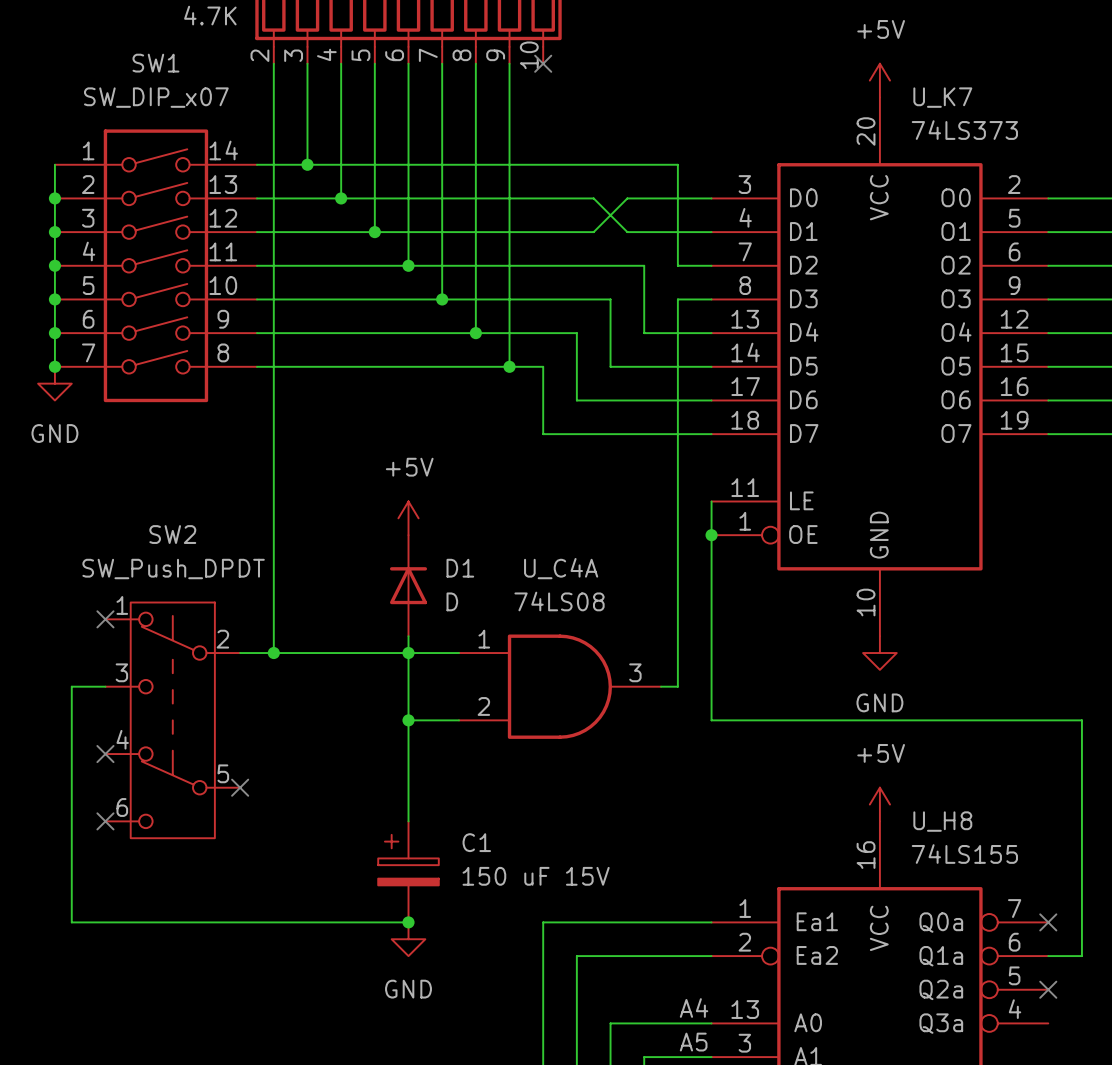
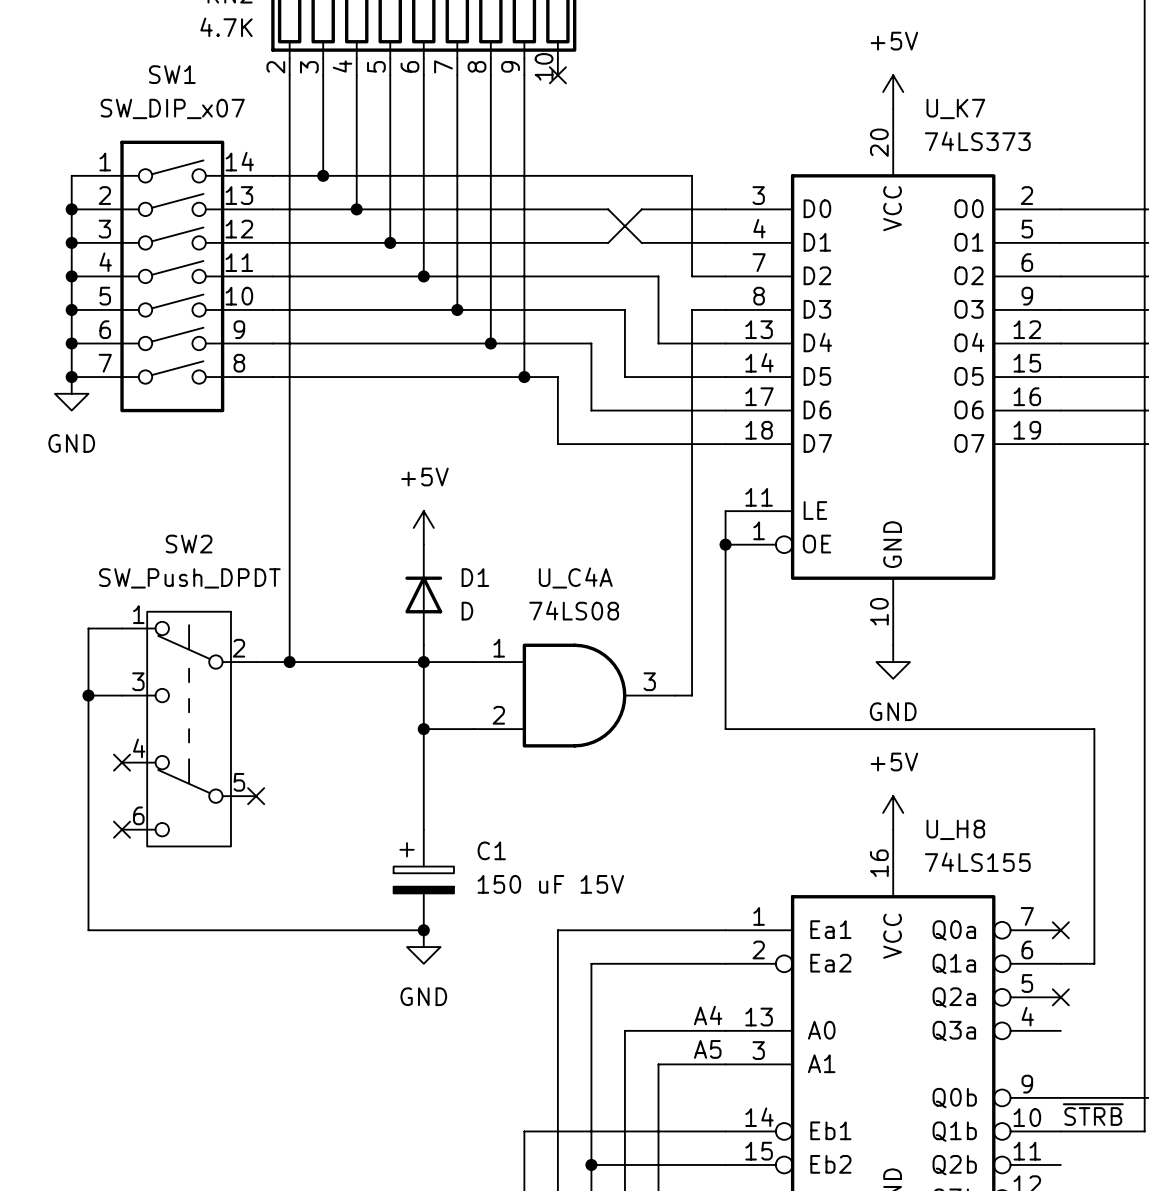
wire: none -> (122, 628) (88, 628) (88, 695)
no-connect mark: (105, 619) -> none
junction: none -> (88, 695)

